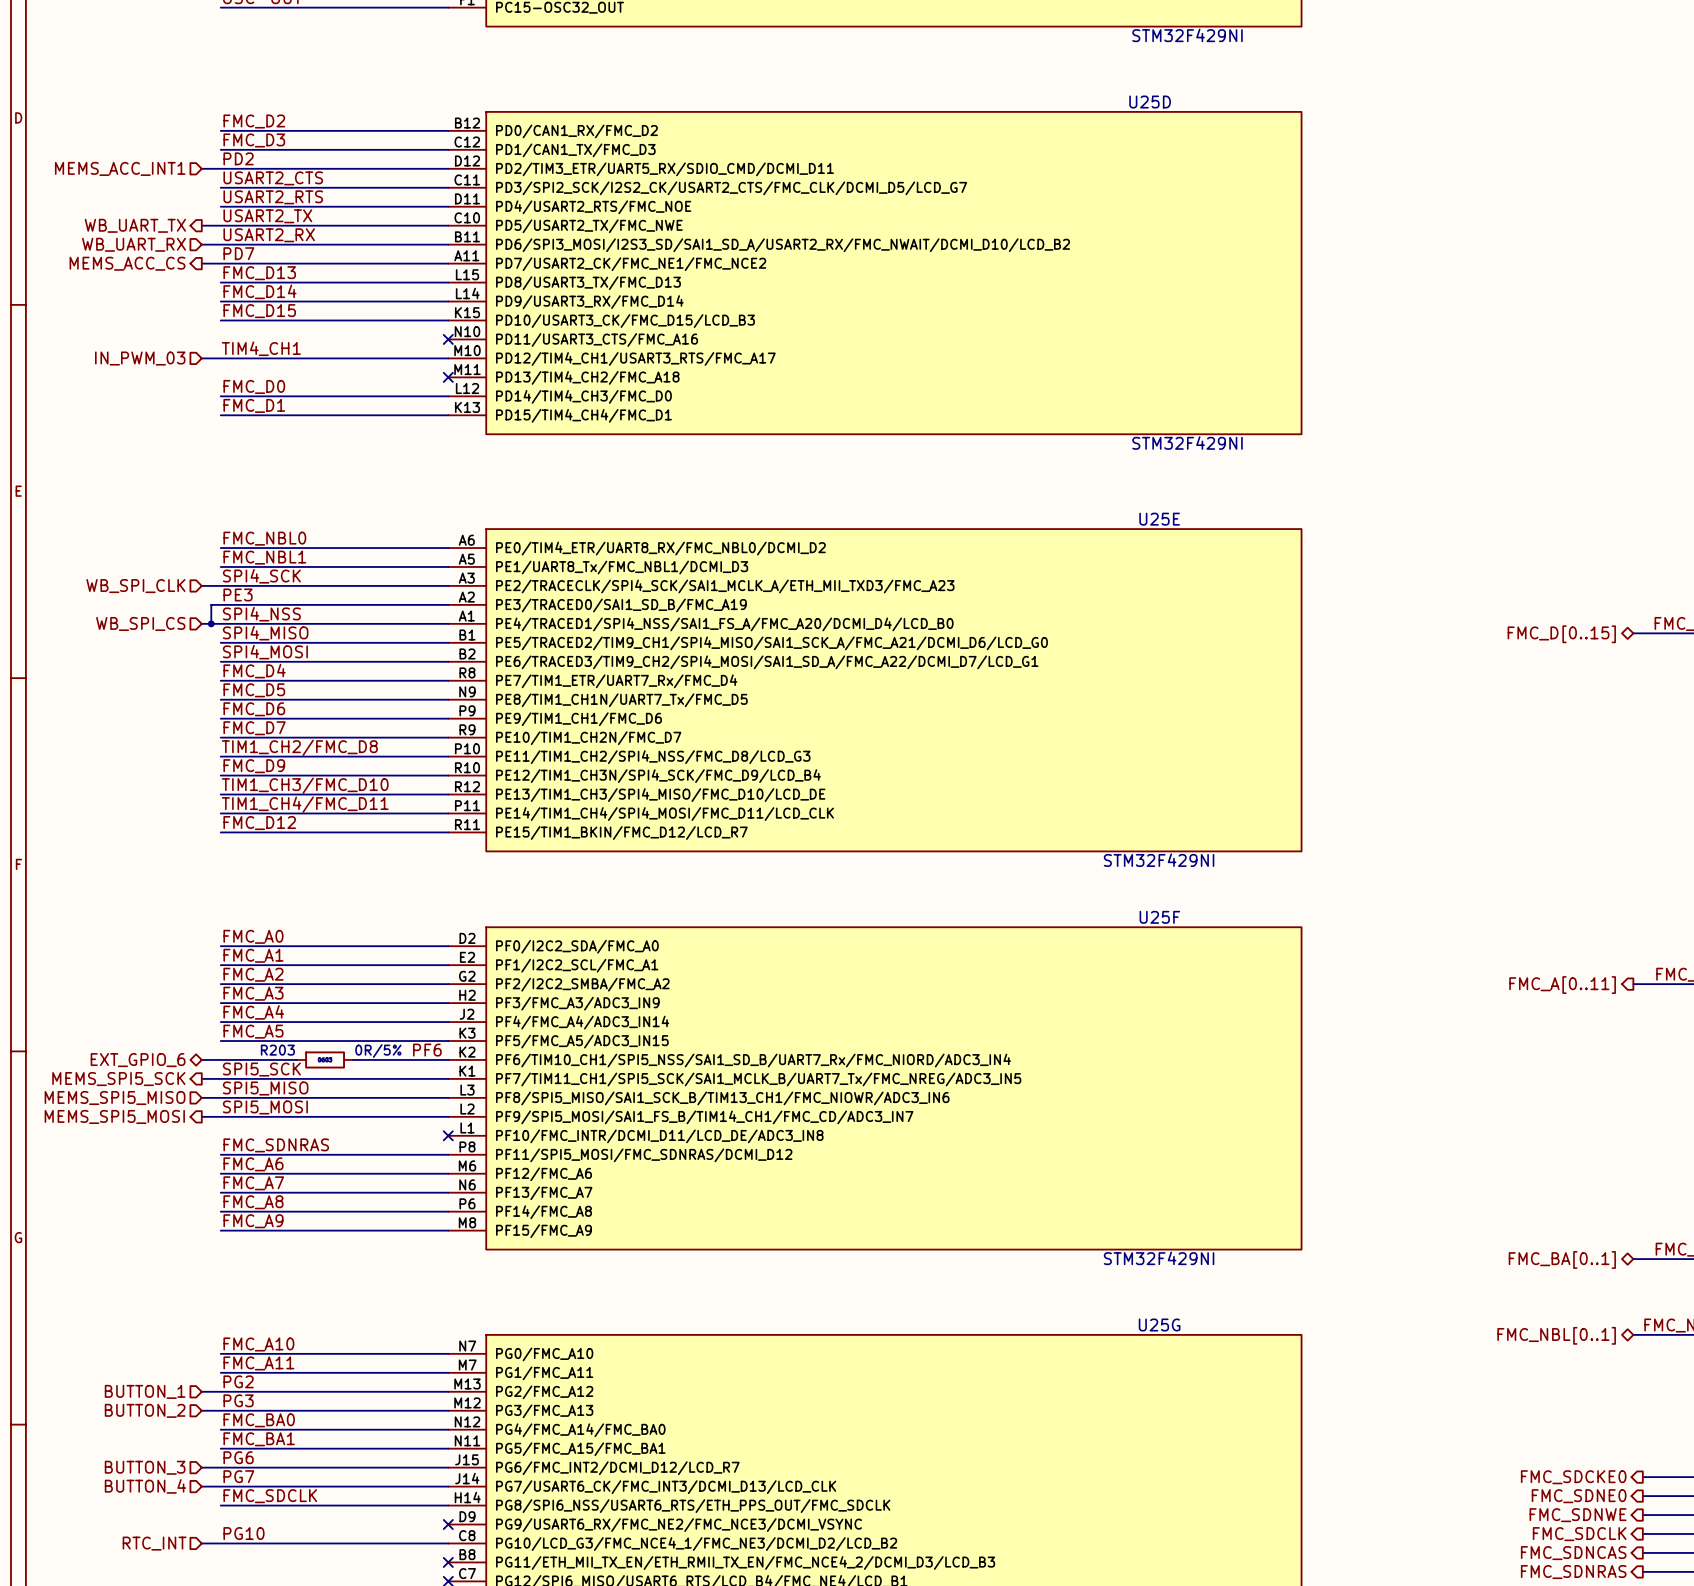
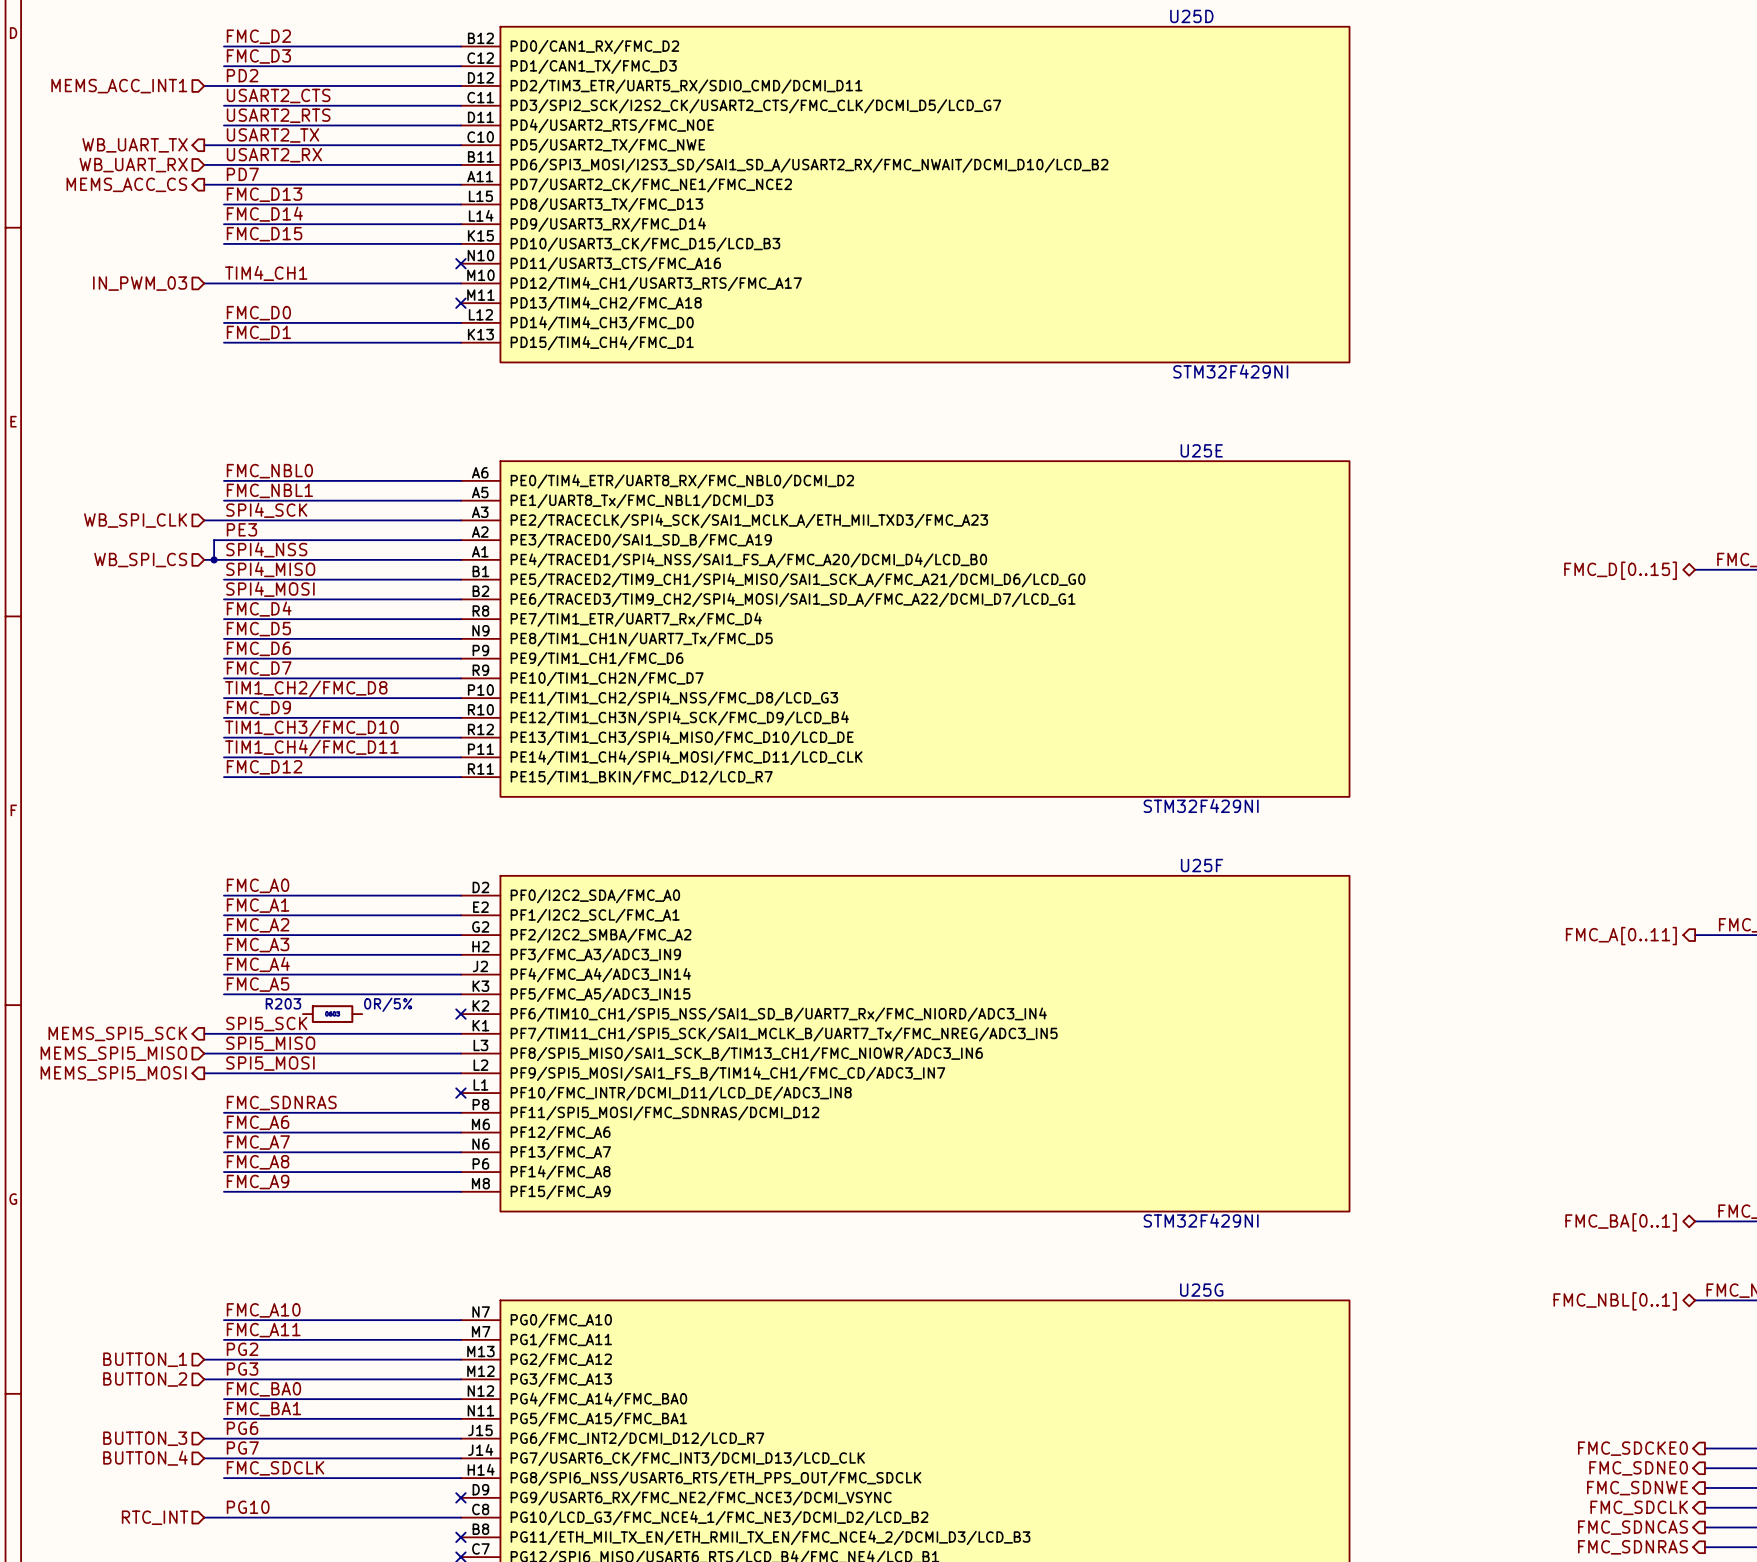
label: PF6 (427, 1050) -> none
wire: (201, 1059) (296, 1059) -> none
wire: (353, 1059) (448, 1059) -> none
no-connect mark: none -> (460, 1014)
hierarchical label: EXT_GPIO_6 (138, 1060) -> none

